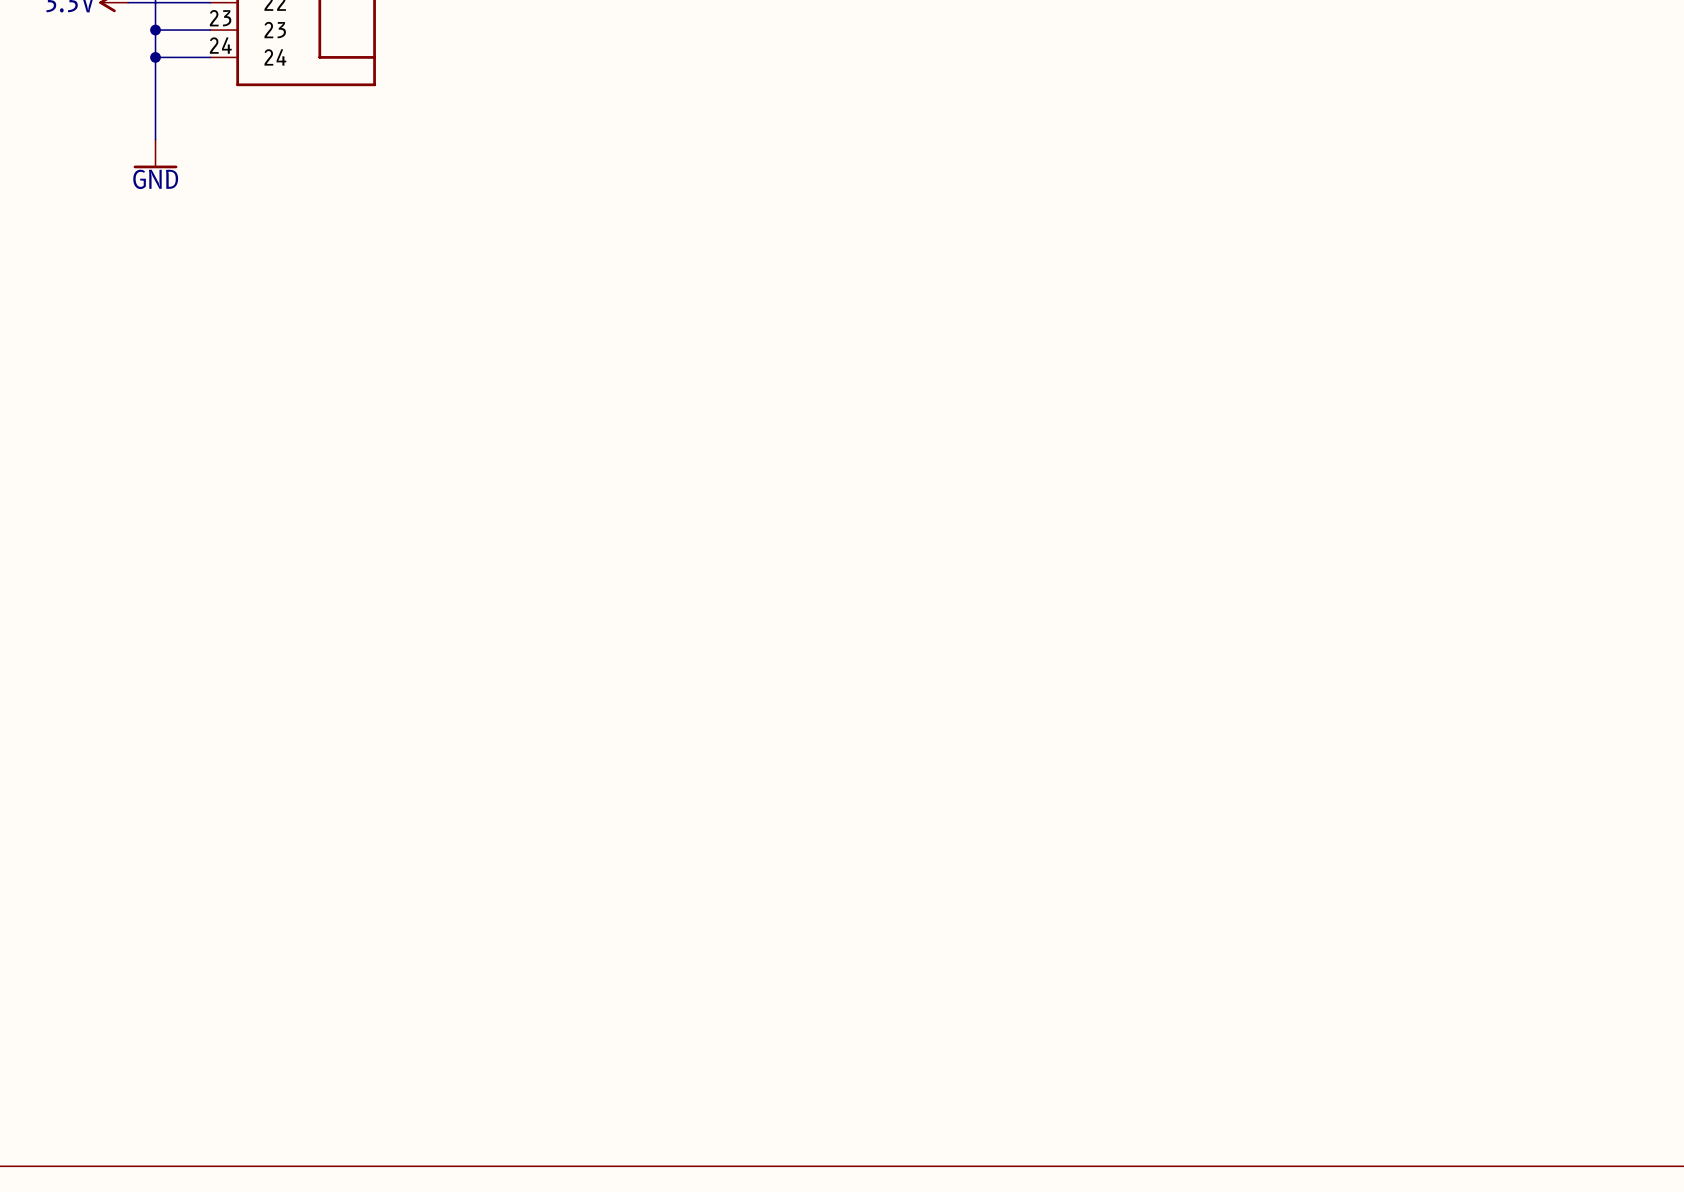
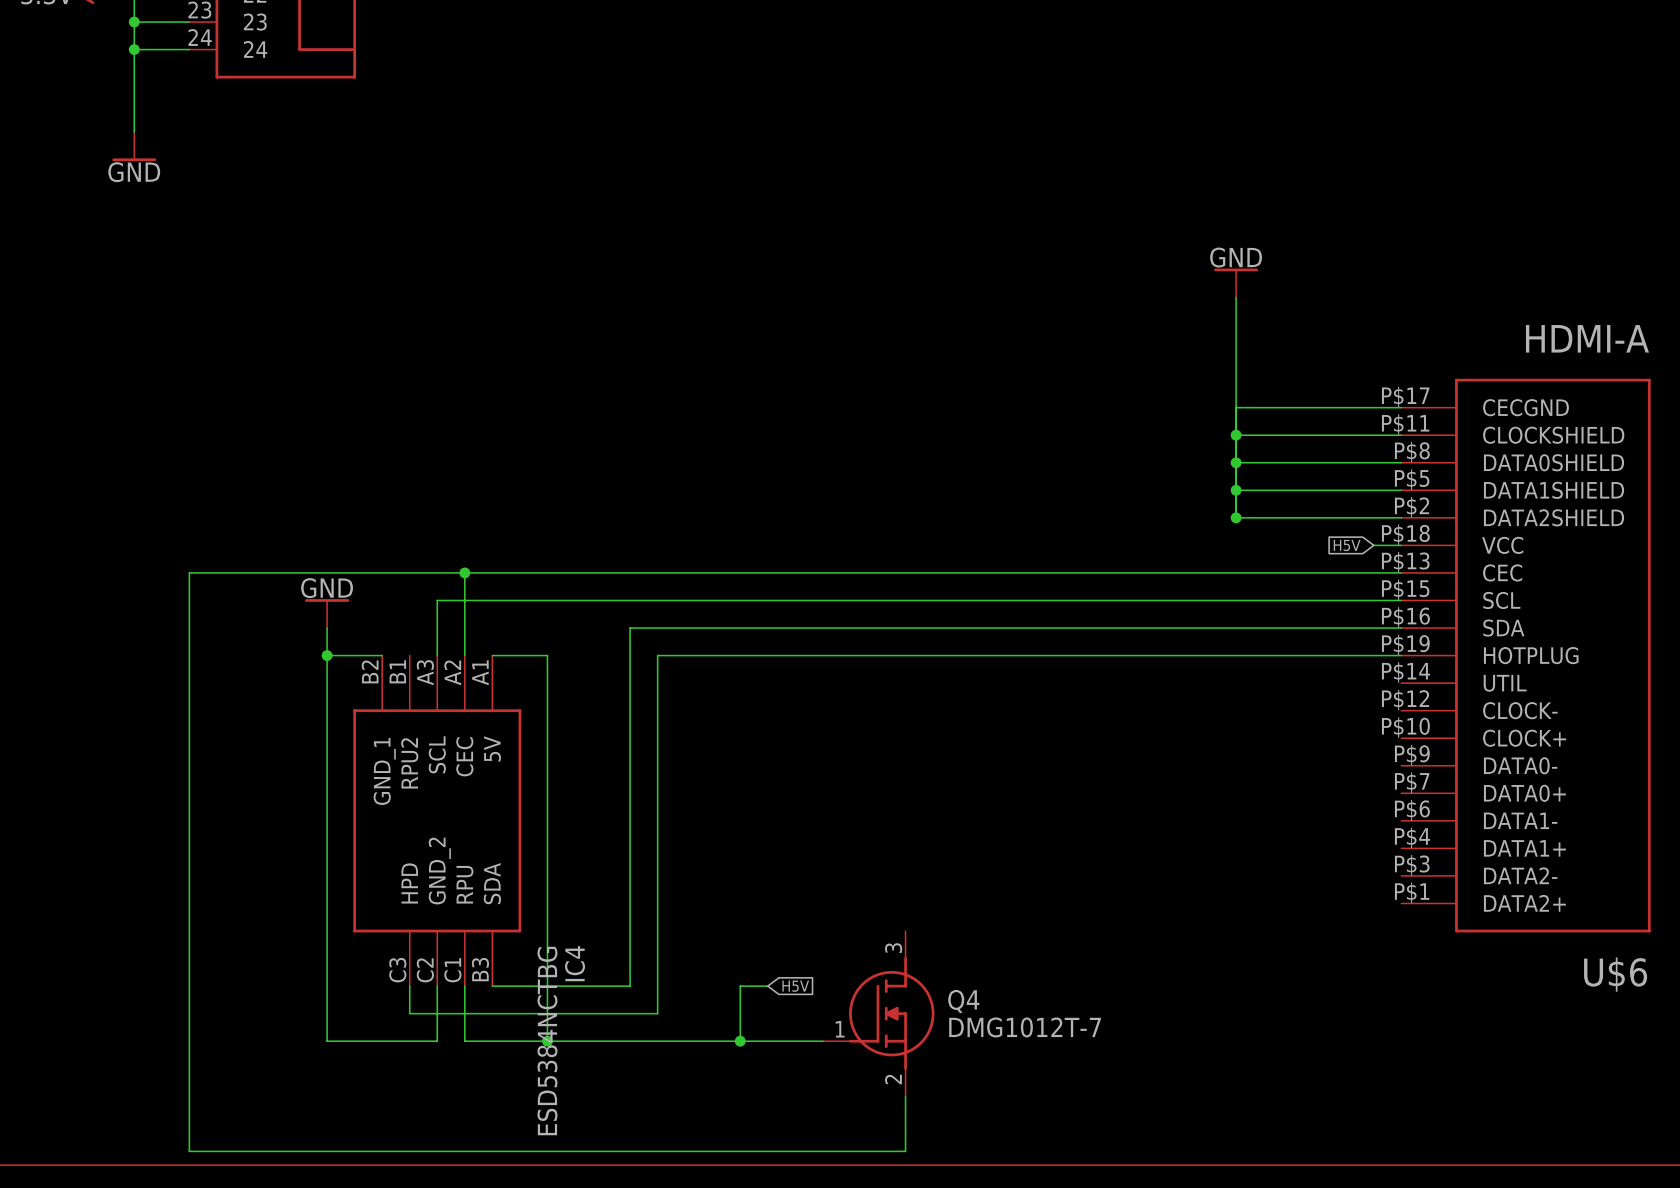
power symbol: none -> GND (1236, 283)
wire: none -> (1236, 297) (1236, 517) (1401, 517)
wire: none -> (1236, 407) (1401, 407)
wire: none -> (1236, 435) (1401, 435)
junction: none -> (1236, 435)
wire: none -> (1236, 462) (1401, 462)
junction: none -> (1236, 462)
wire: none -> (1236, 490) (1401, 490)
junction: none -> (1236, 490)
junction: none -> (1236, 517)
global label: none -> H5V (1347, 545)
wire: none -> (1373, 545) (1401, 545)
wire: none -> (464, 572) (464, 655)
junction: none -> (464, 572)
wire: none -> (1401, 572) (189, 572) (189, 1151) (905, 1151) (905, 1096)
wire: none -> (1401, 600) (437, 600) (437, 655)
power symbol: none -> GND (327, 613)
wire: none -> (327, 628) (327, 1041) (437, 1041) (437, 986)
wire: none -> (1401, 628) (630, 628) (630, 986) (492, 986)
wire: none -> (327, 655) (382, 655)
junction: none -> (327, 655)
wire: none -> (492, 655) (547, 655) (547, 1041)
wire: none -> (1401, 655) (657, 655) (657, 1013) (409, 1013) (409, 986)
U$6: none -> HDMI-A (1526, 655)
IC4: none -> ESD5384NCTBG (437, 820)
wire: none -> (464, 986) (464, 1041) (822, 1041)
wire: none -> (767, 986) (740, 986) (740, 1041)
global label: none -> H5V (795, 986)
Q4: none -> DMG1012T-7 (878, 1013)
junction: none -> (547, 1041)
junction: none -> (740, 1041)

